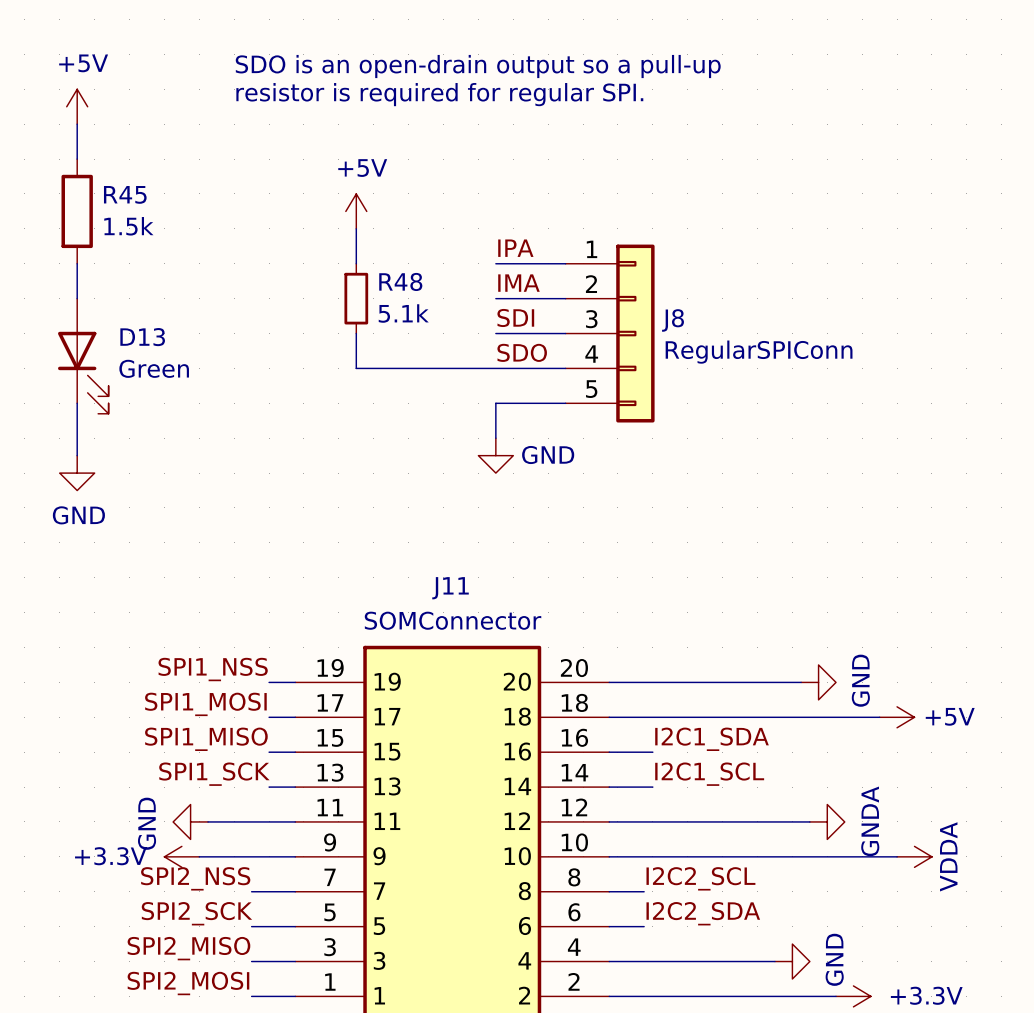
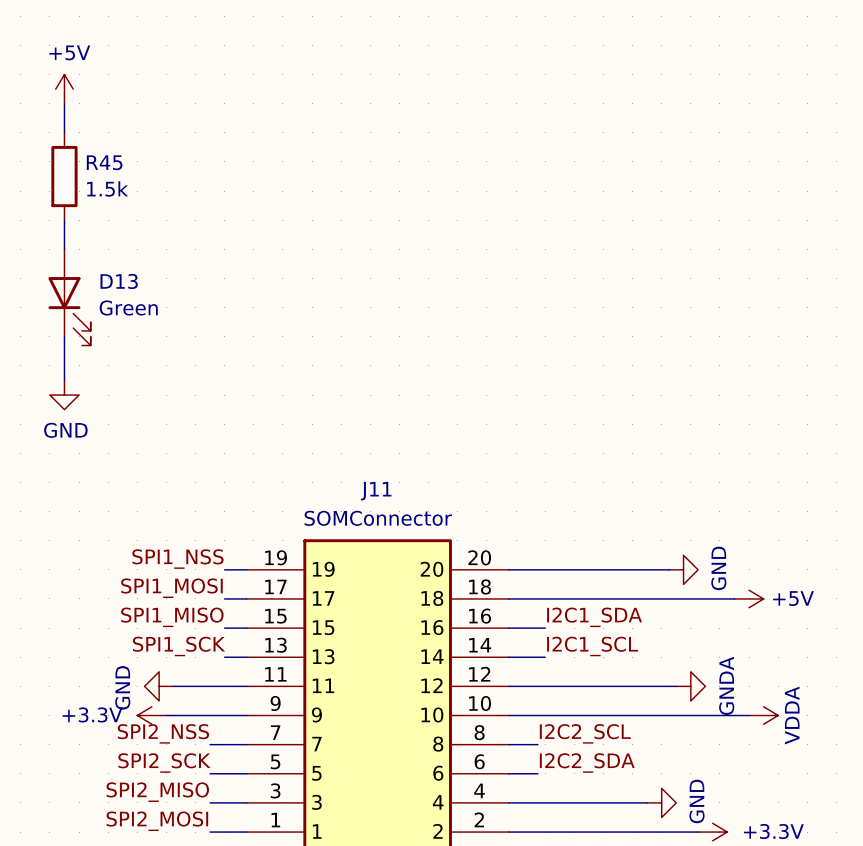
text: SDO is an open-drain output so a pull-up (478, 66) -> none
text: resistor is required for regular SPI. (439, 94) -> none
power symbol: +5V (356, 211) -> none
wire: (356, 228) (356, 263) -> none
label: IPA (515, 248) -> none
wire: (495, 263) (565, 263) -> none
label: IMA (518, 283) -> none
R48: 5.1k (356, 298) -> none
wire: (495, 298) (565, 298) -> none
label: SDI (515, 317) -> none
wire: (356, 333) (356, 368) (565, 368) -> none
wire: (495, 333) (565, 333) -> none
J8: RegularSPIConn (610, 333) -> none
label: SDO (522, 352) -> none
wire: (565, 403) (495, 403) (495, 438) -> none
power symbol: GND (495, 455) -> none

